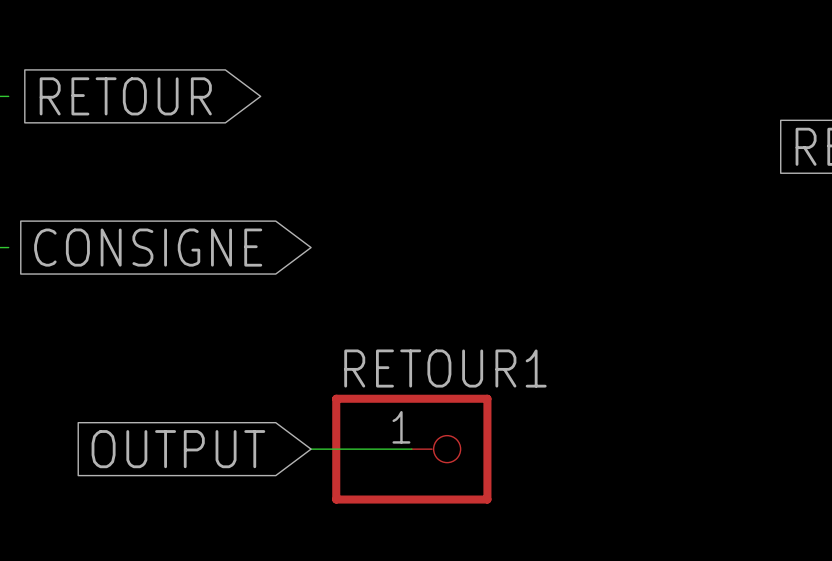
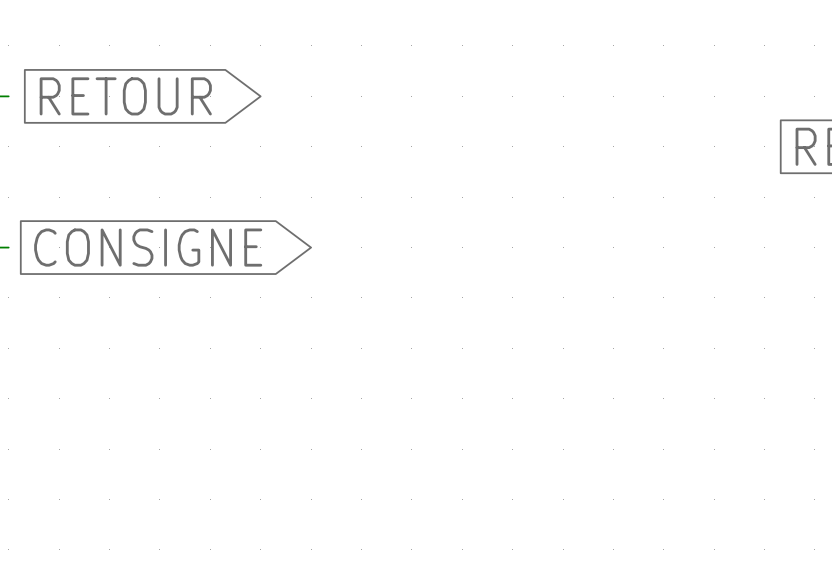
global label: OUTPUT (178, 449) -> none
wire: (311, 449) (411, 449) -> none
RETOUR1: (411, 449) -> none

